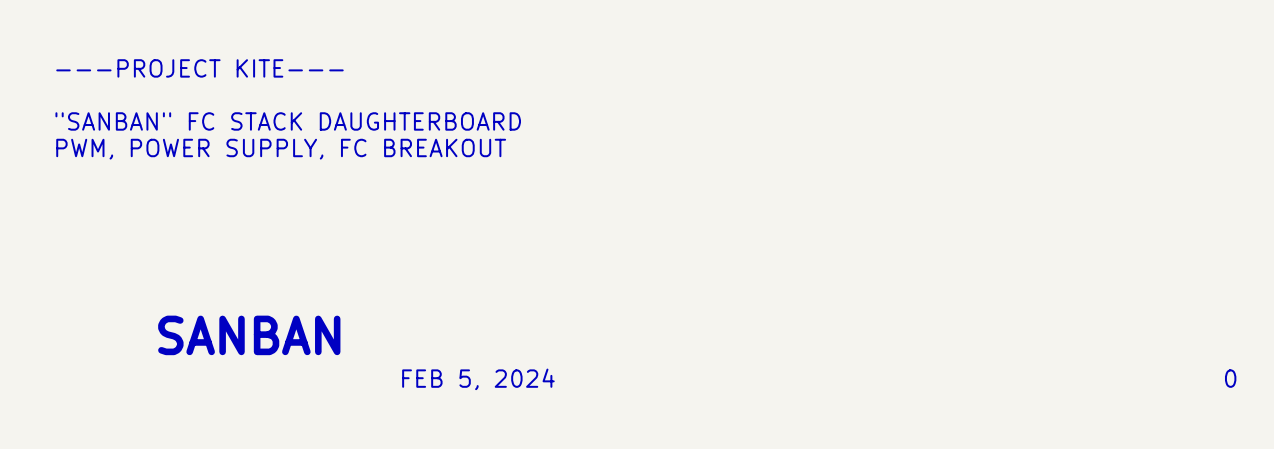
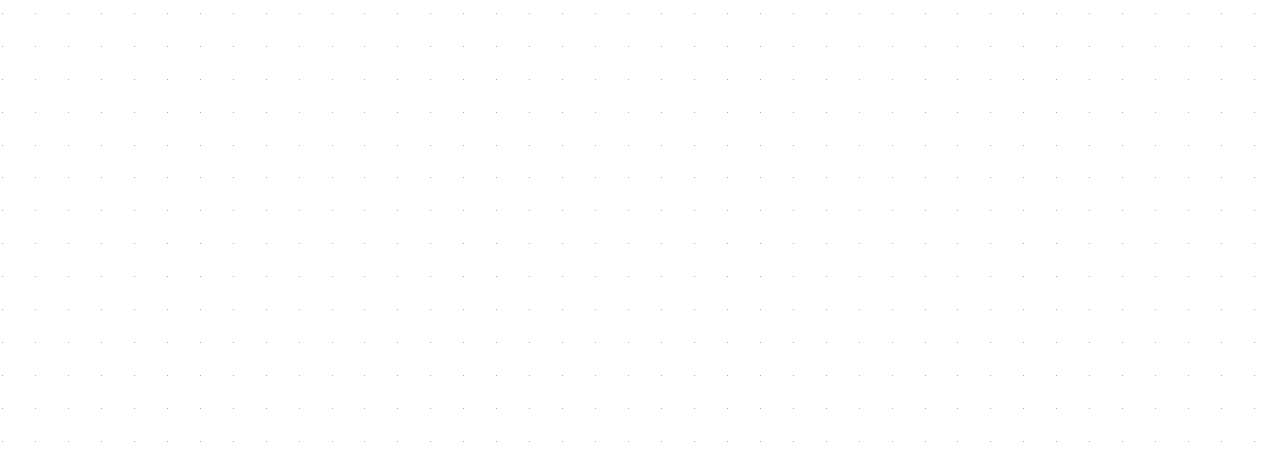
text: ---PROJECT KITE--- (199, 68) -> none
text: "SANBAN" FC STACK DAUGHTERBOARD (288, 121) -> none
text: PWM, POWER SUPPLY, FC BREAKOUT (281, 149) -> none
text: SANBAN (249, 335) -> none
text: 0 (1230, 378) -> none
text: FEB 5, 2024 (478, 379) -> none

